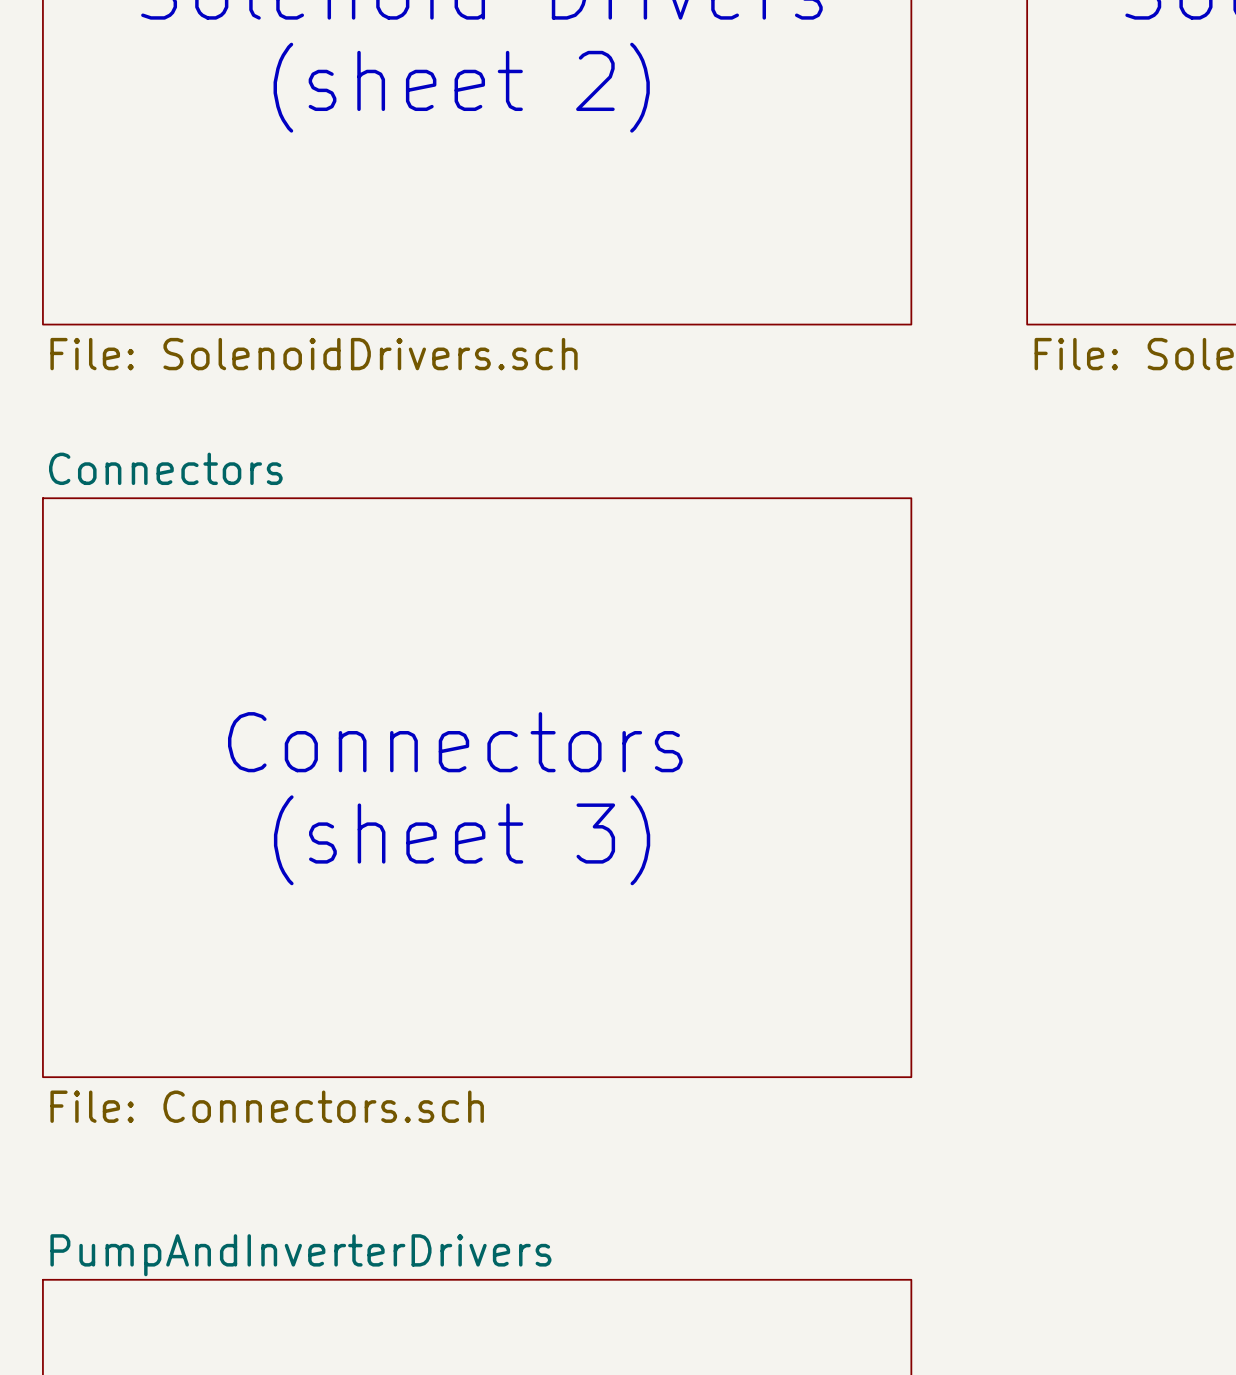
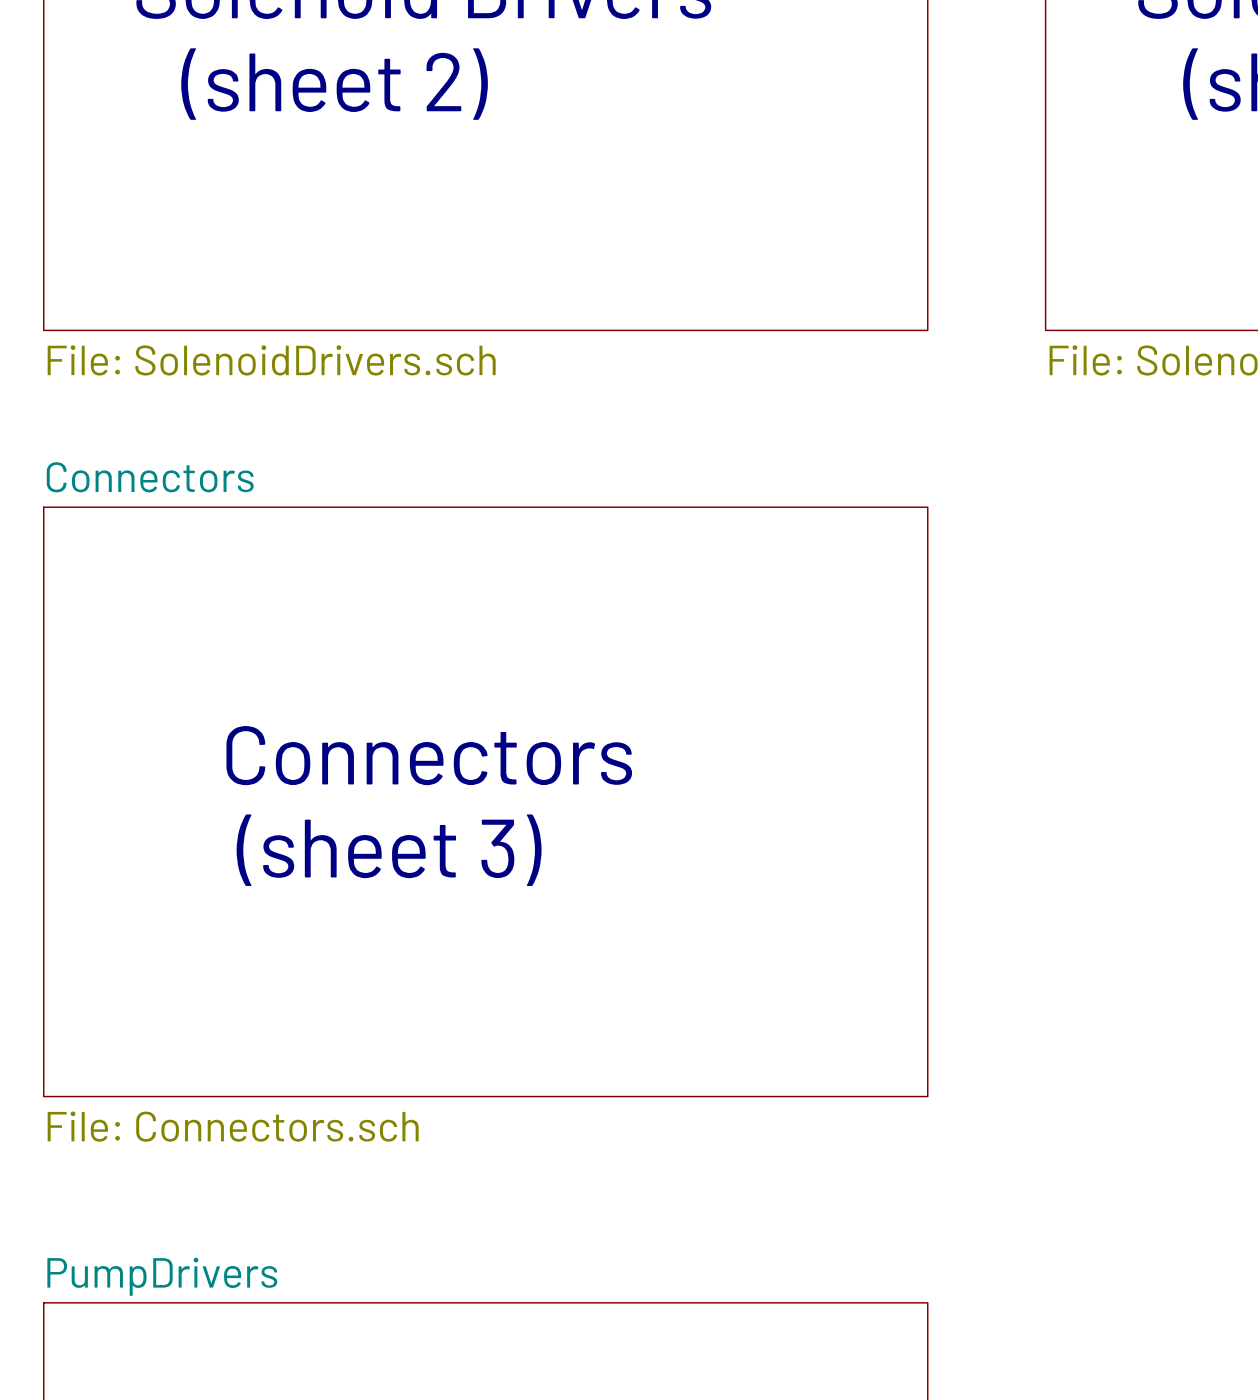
sheet PumpAndInverterDrivers name: PumpAndInverterDrivers (300, 1255) -> PumpDrivers (162, 1276)

